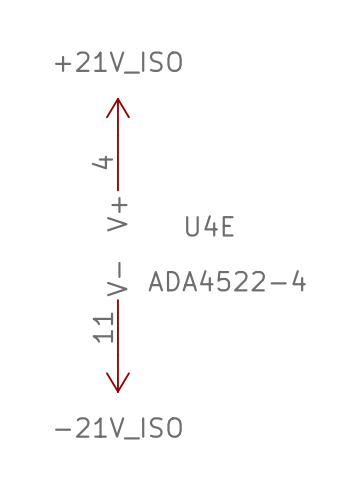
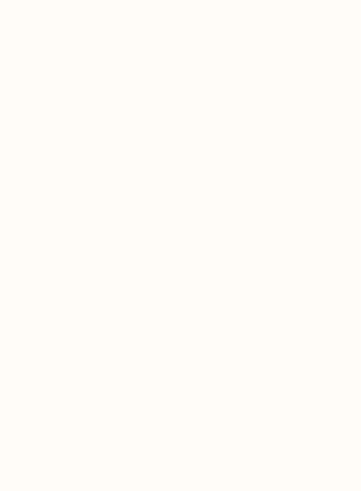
power symbol: +21V_ISO (117, 117) -> none
U4E: ADA4522-4 (117, 245) -> none
power symbol: -21V_ISO (117, 373) -> none

